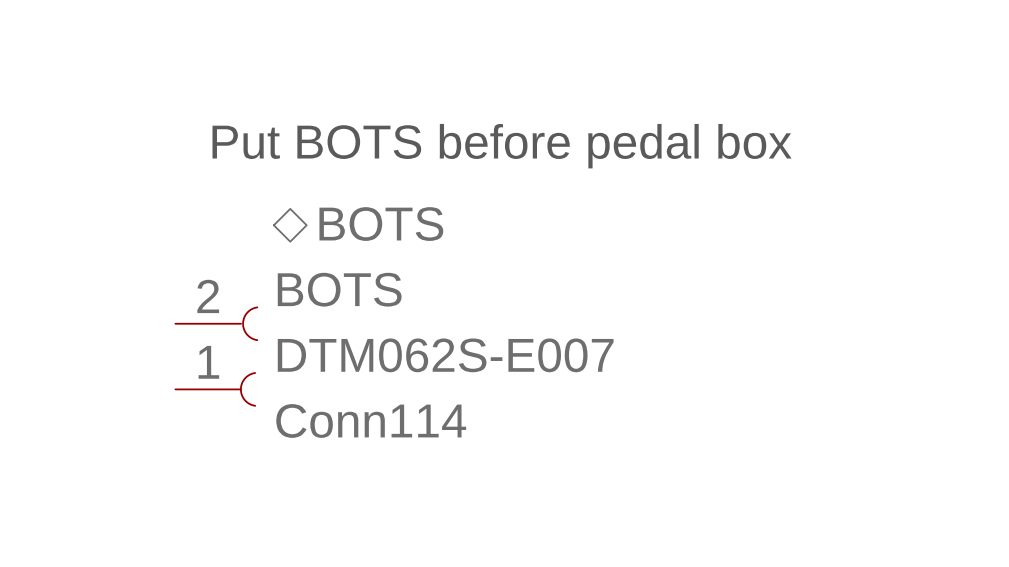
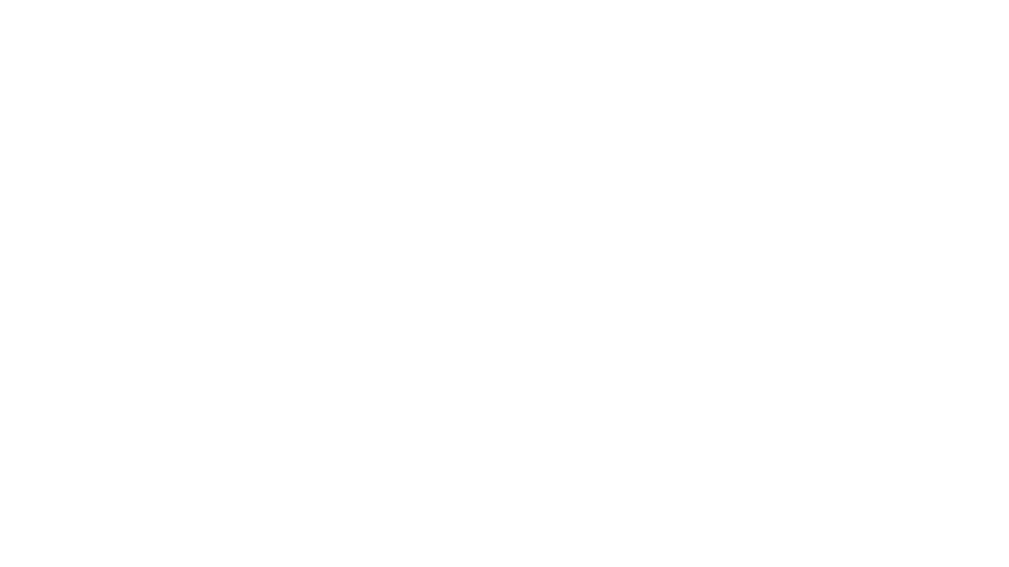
text: Put BOTS before pedal box (502, 146) -> none
hierarchical label: BOTS (381, 224) -> none
Conn114: (216, 356) -> none

